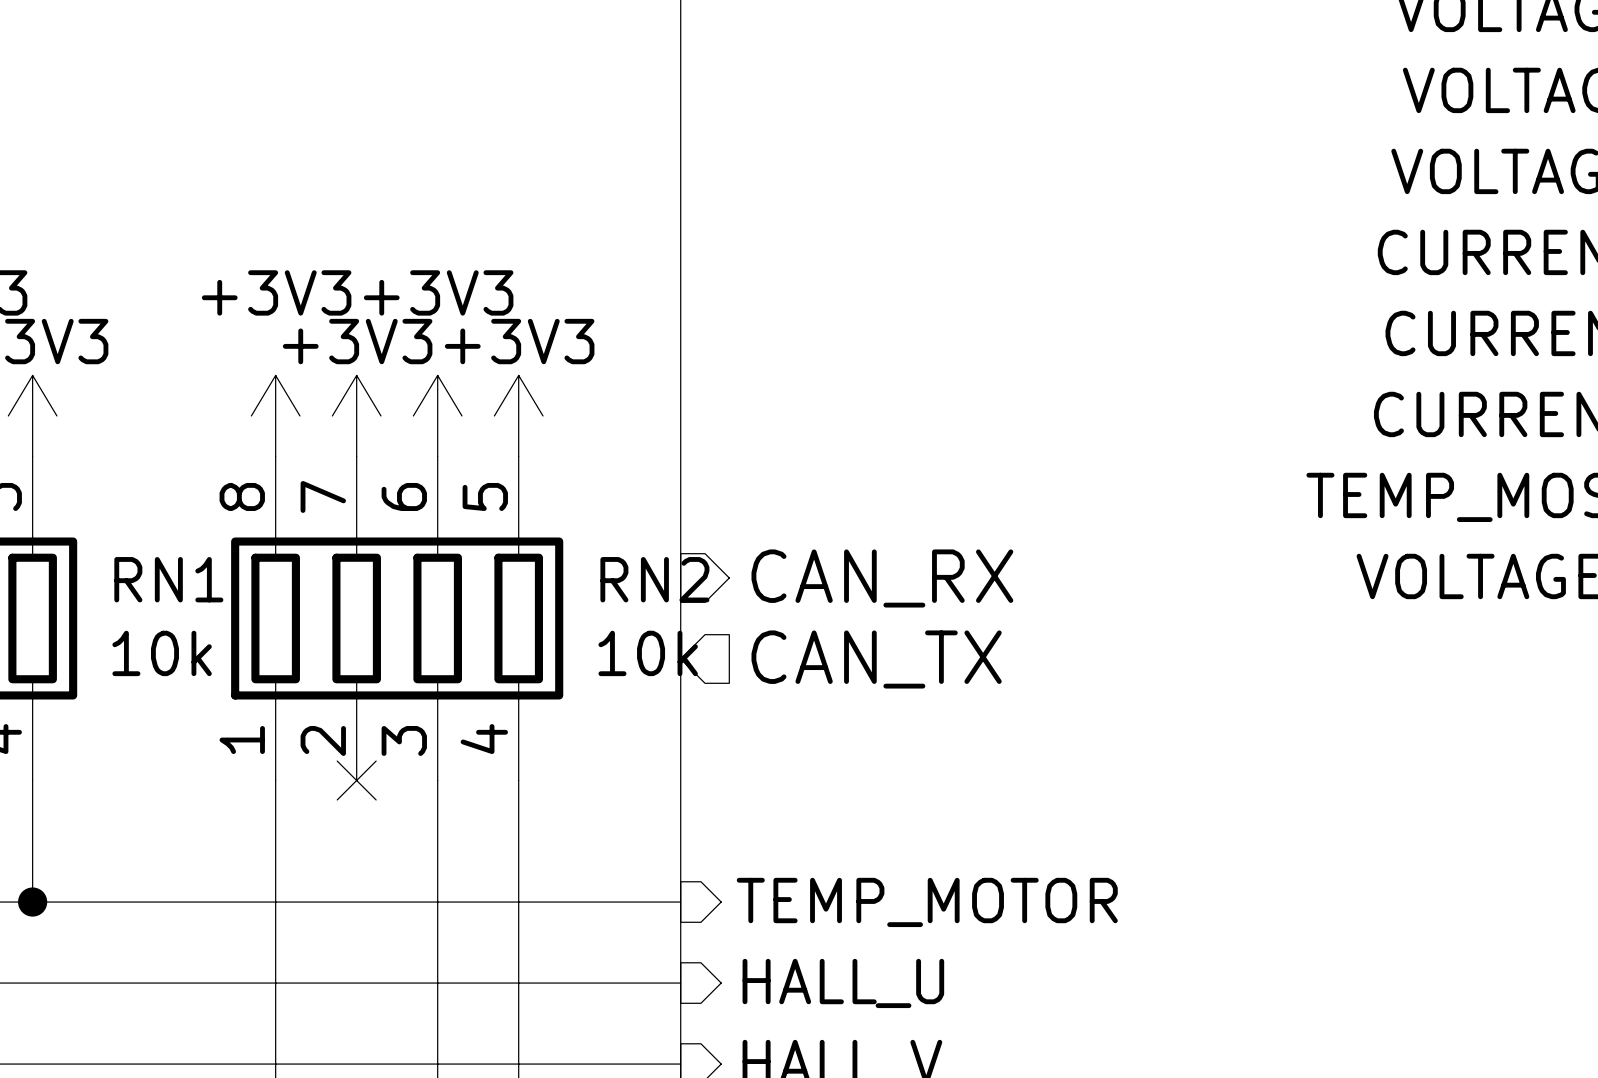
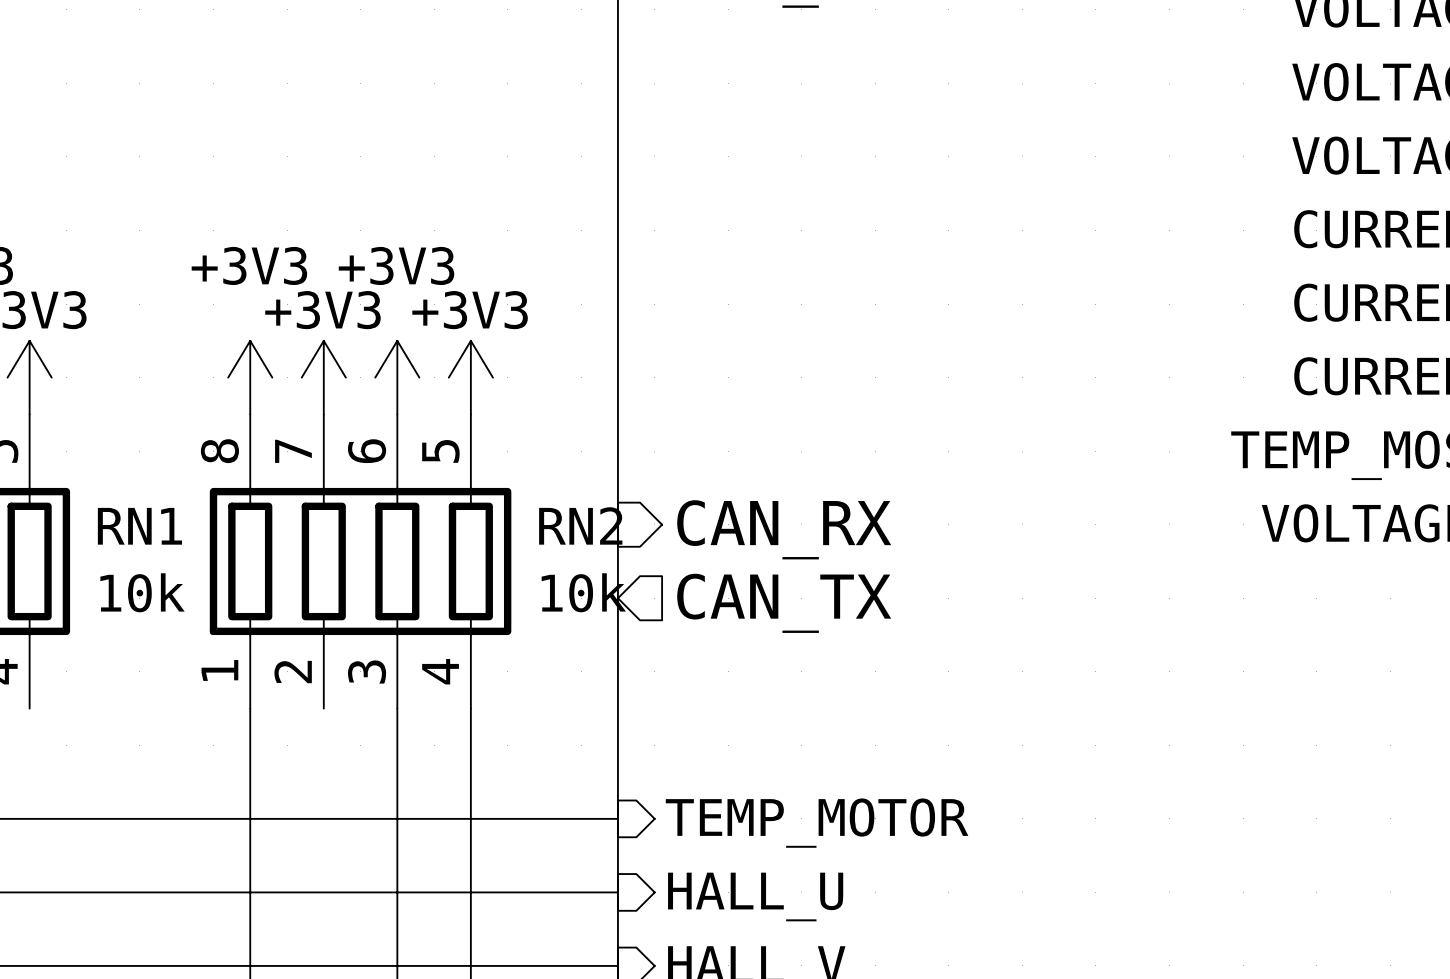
wire: (32, 780) (32, 902) -> none
no-connect mark: (356, 780) -> none
junction: (32, 902) -> none

